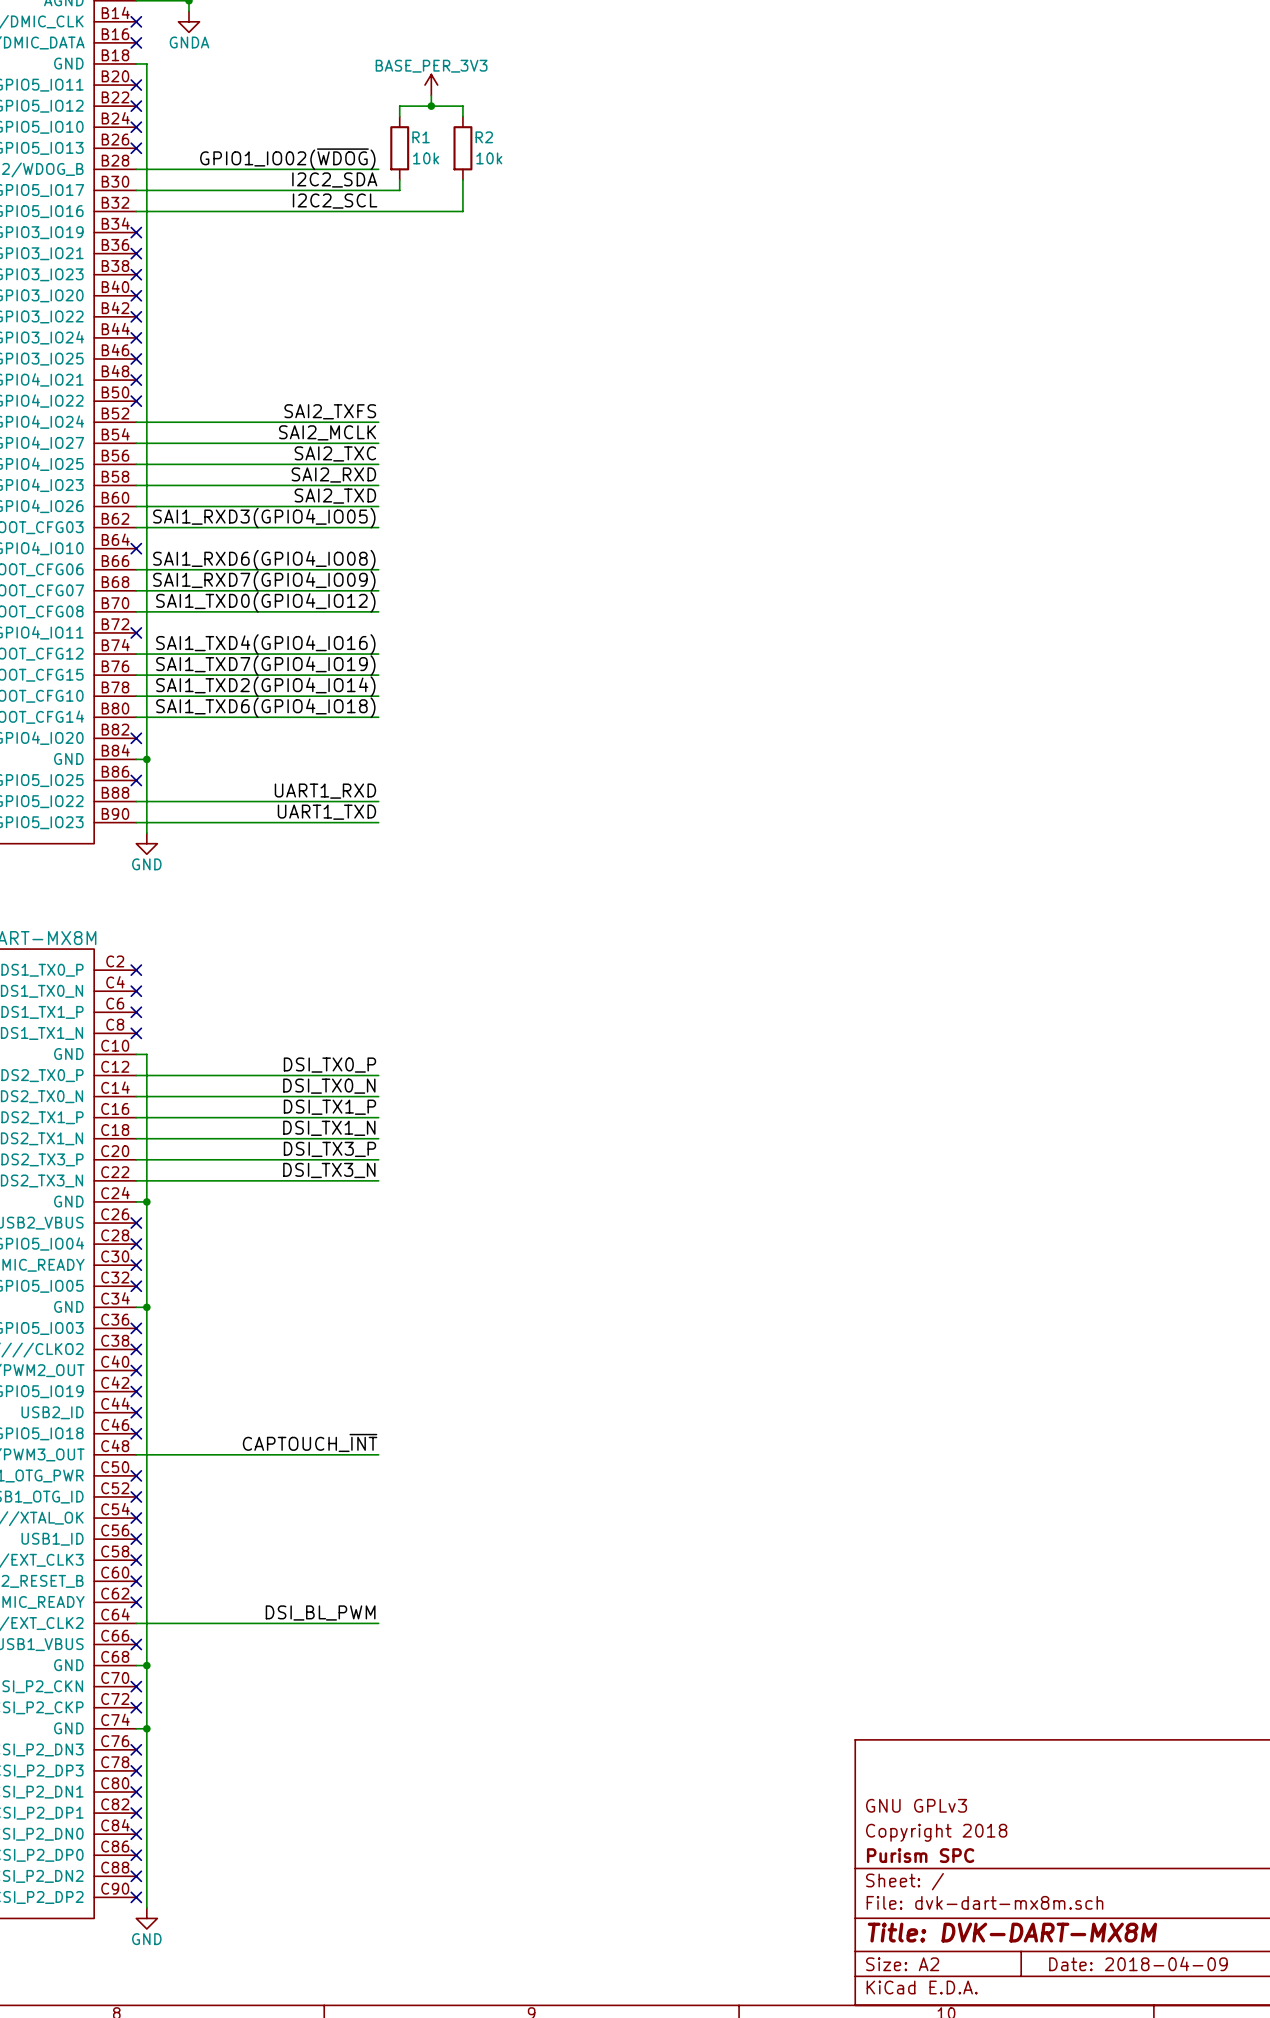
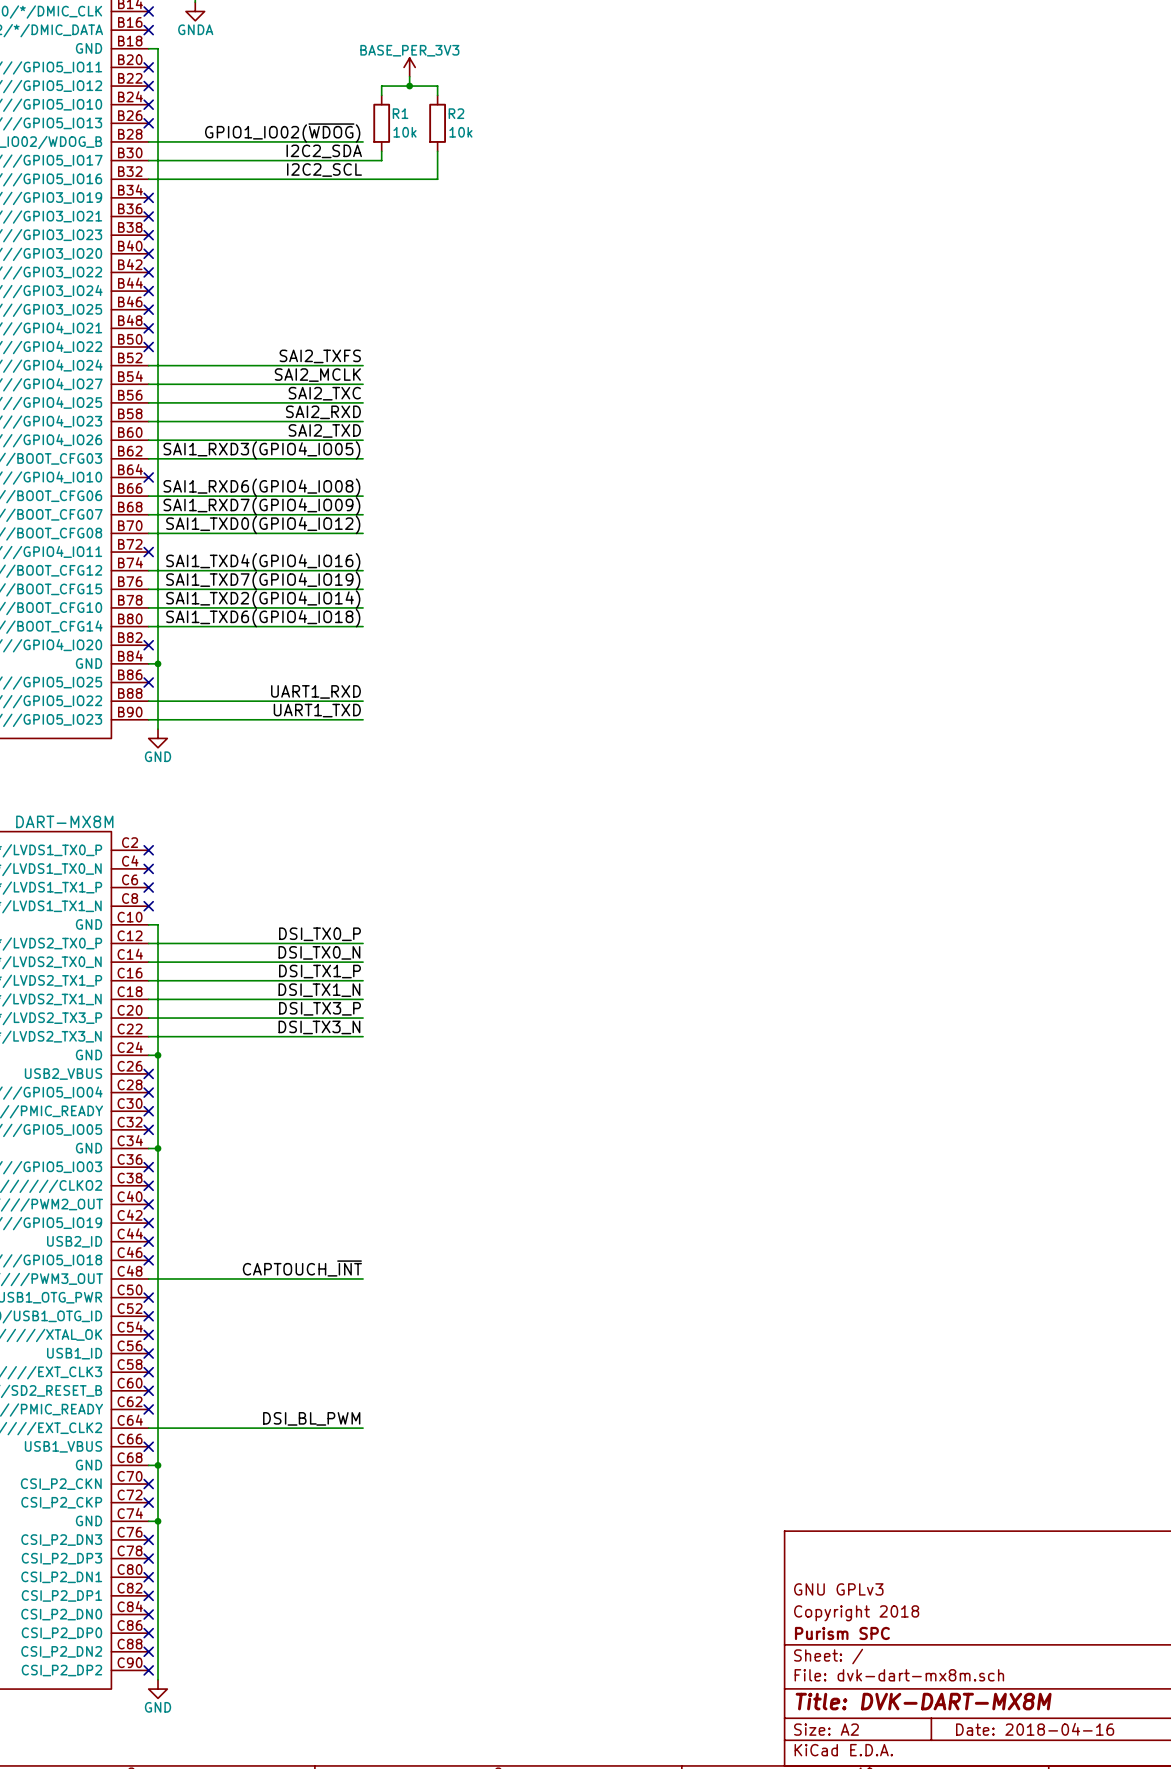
title block: Date: 2018-04-09 (1138, 1963) -> Date: 2018-04-16 (1035, 1729)

